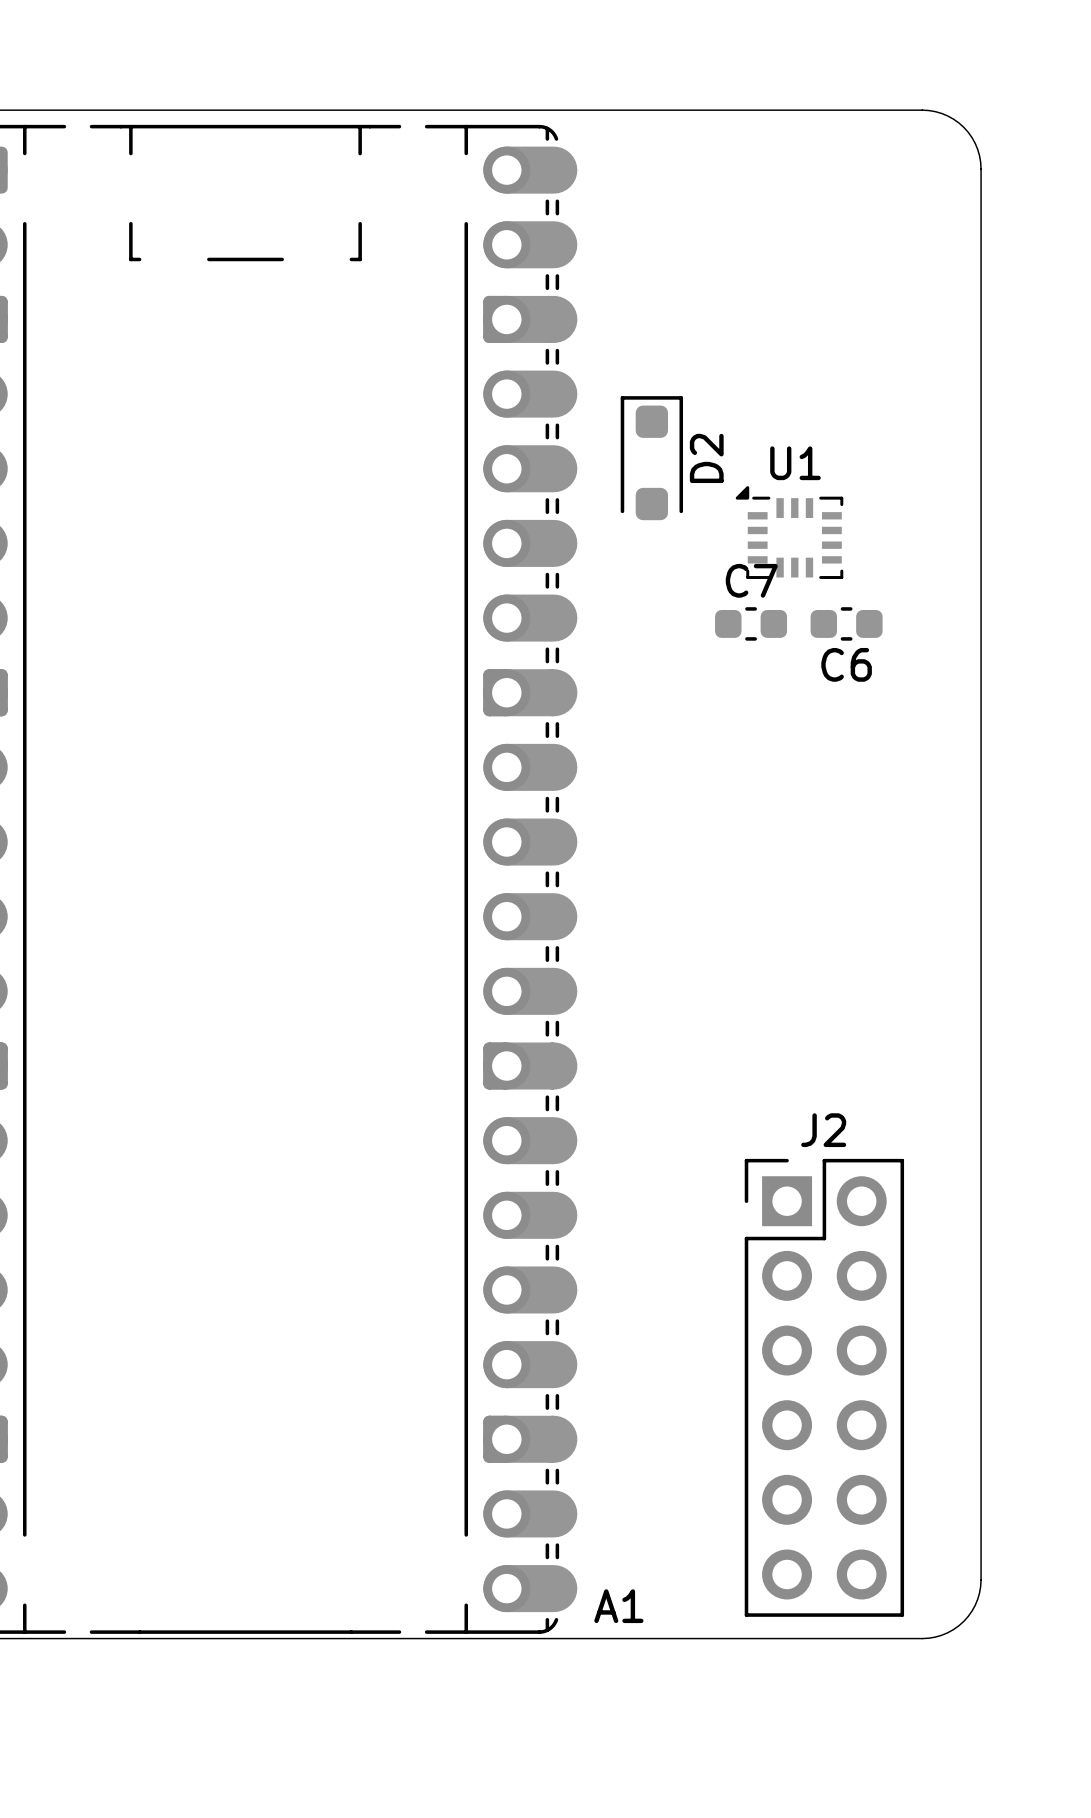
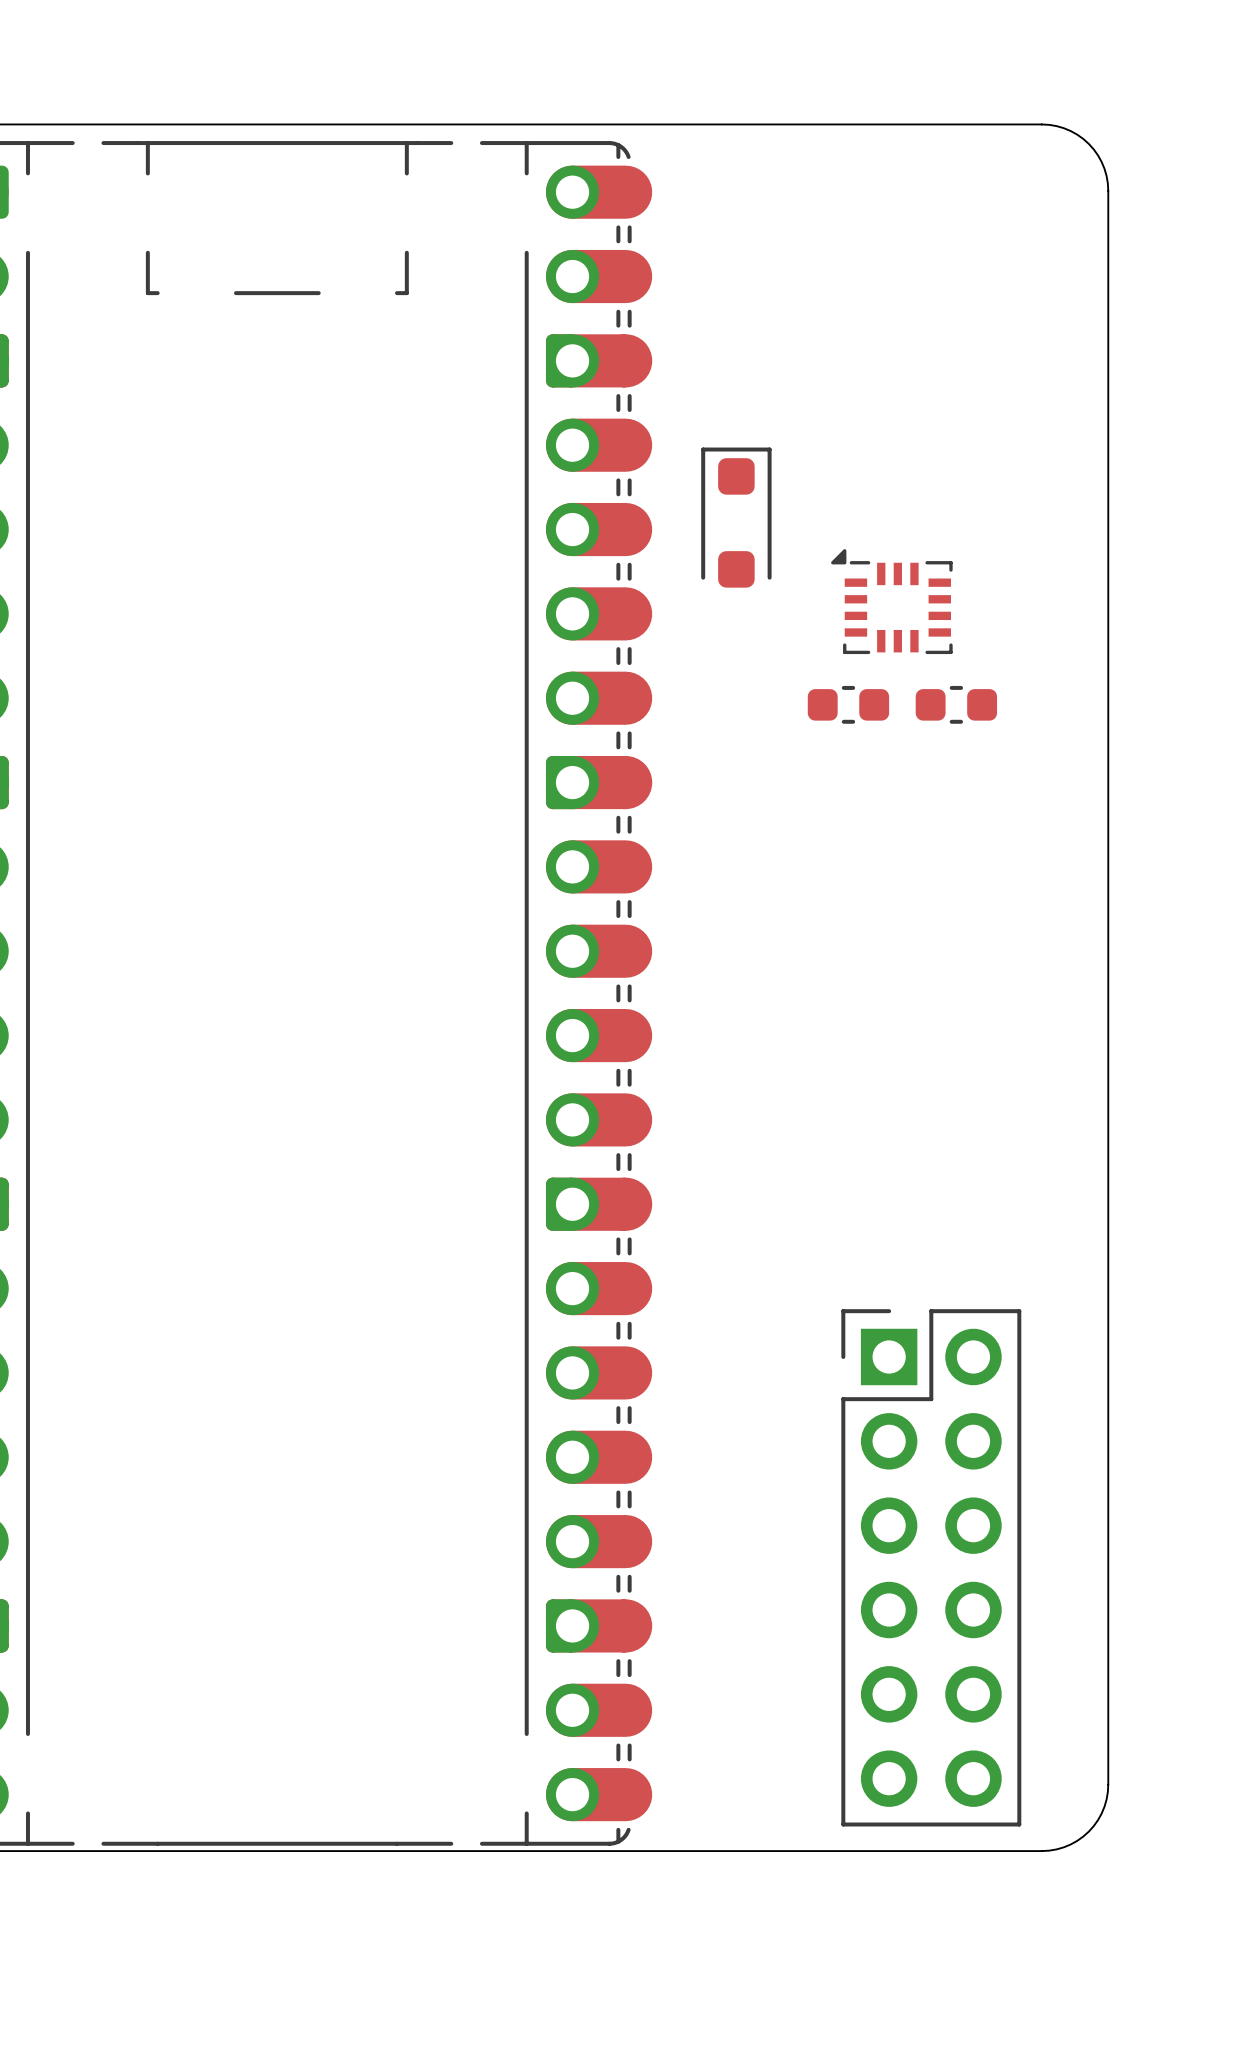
D2 name: D2 (706, 458) -> none
U1 name: U1 (795, 463) -> none
C7 name: C7 (751, 580) -> none
C6 name: C6 (846, 664) -> none
J2 name: J2 (823, 1130) -> none
A1 name: A1 (618, 1606) -> none

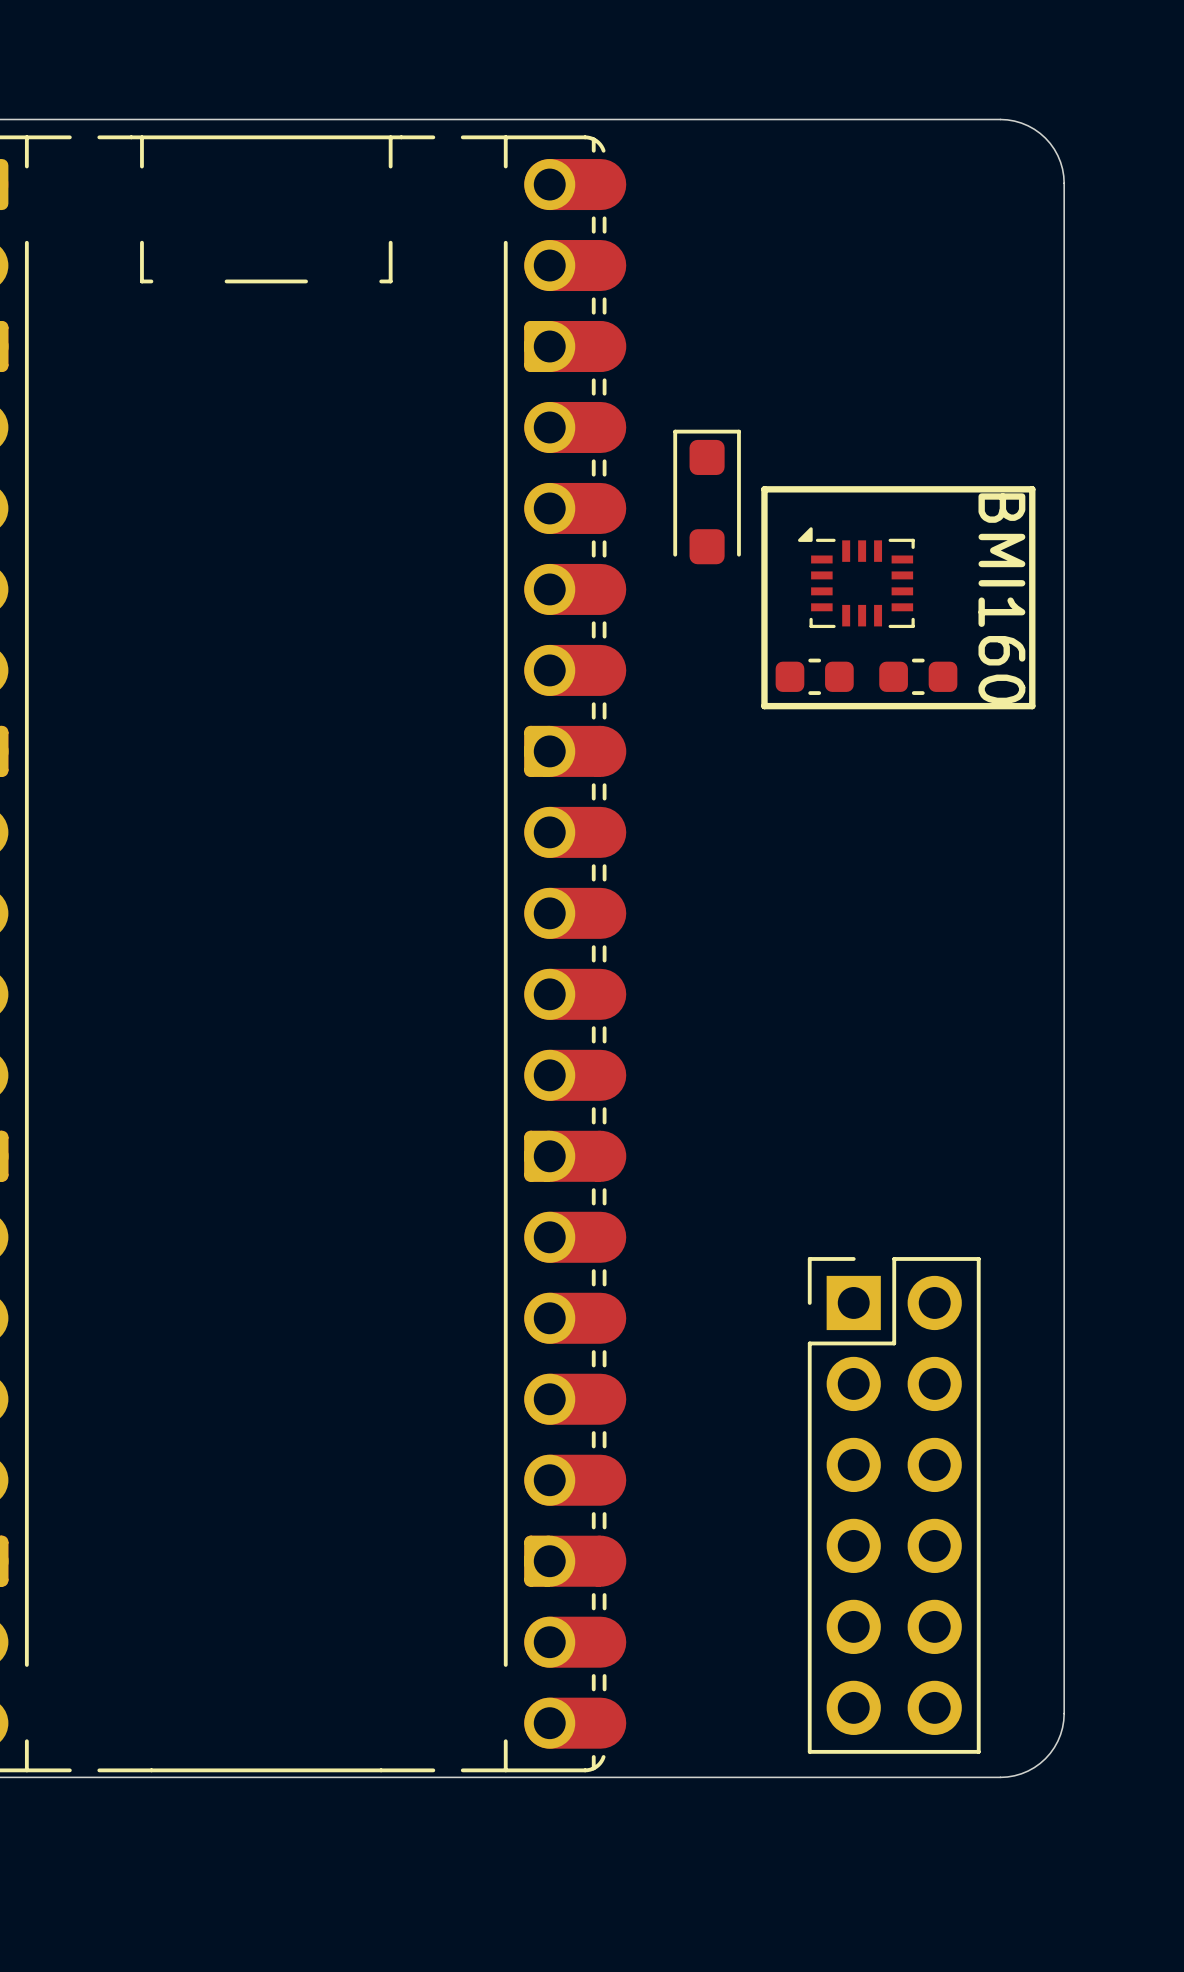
line: none -> (764, 489) (1032, 489) (1032, 706) (764, 706) (764, 489)
part value: none -> BMI160 (1001, 598)

